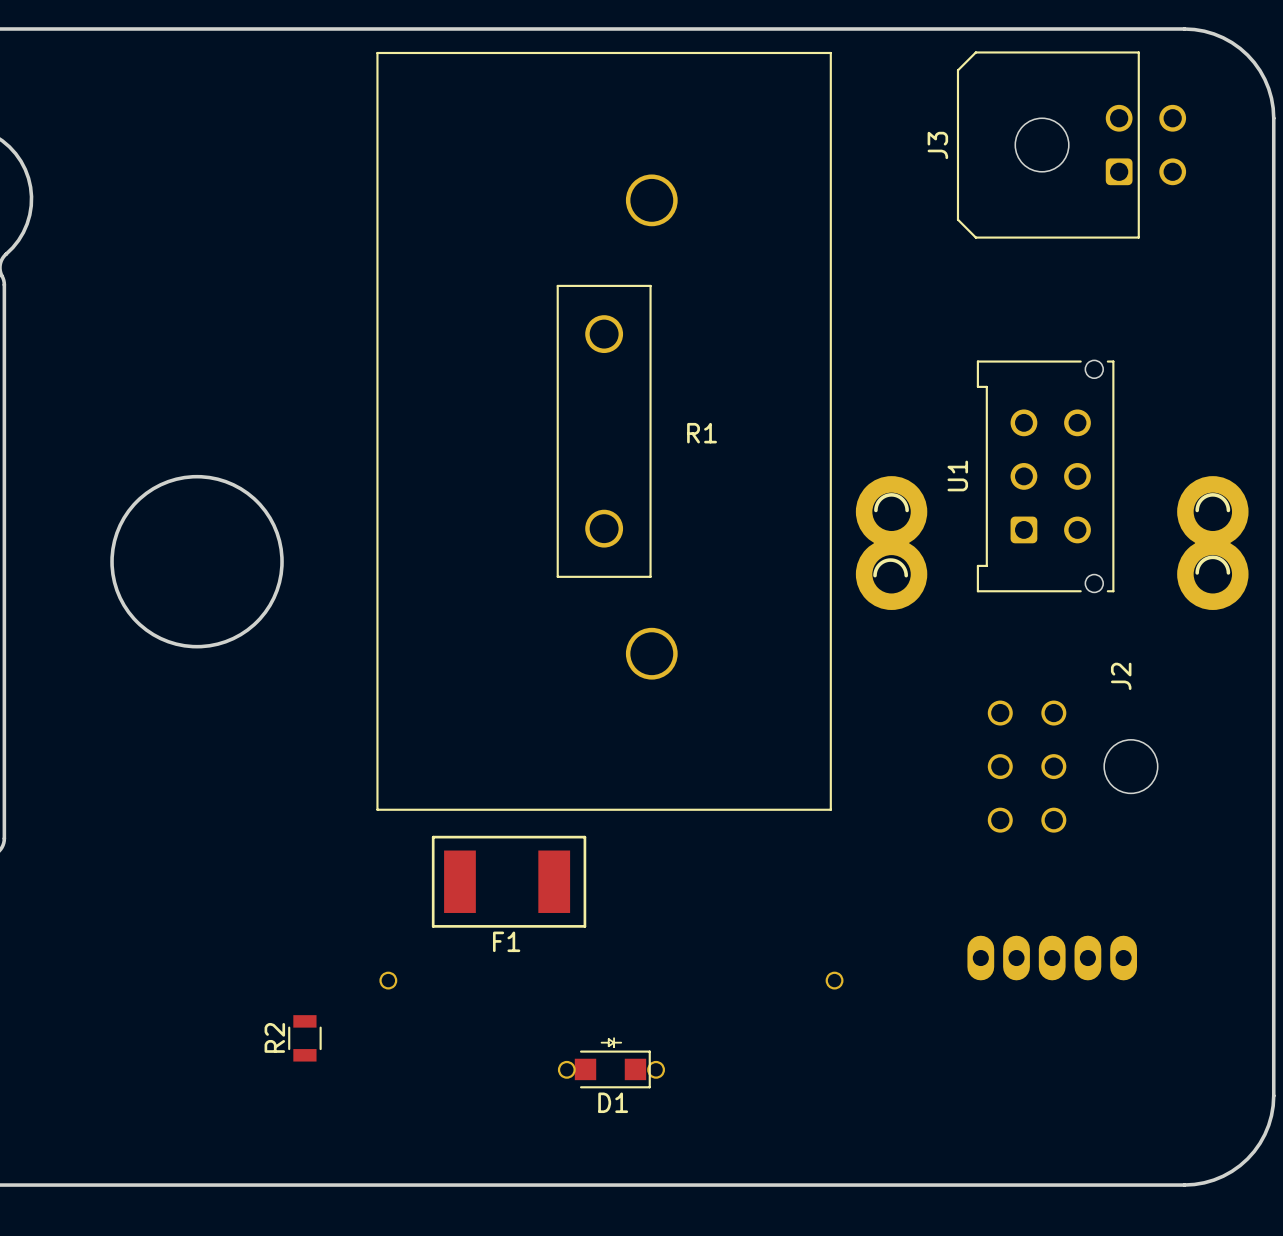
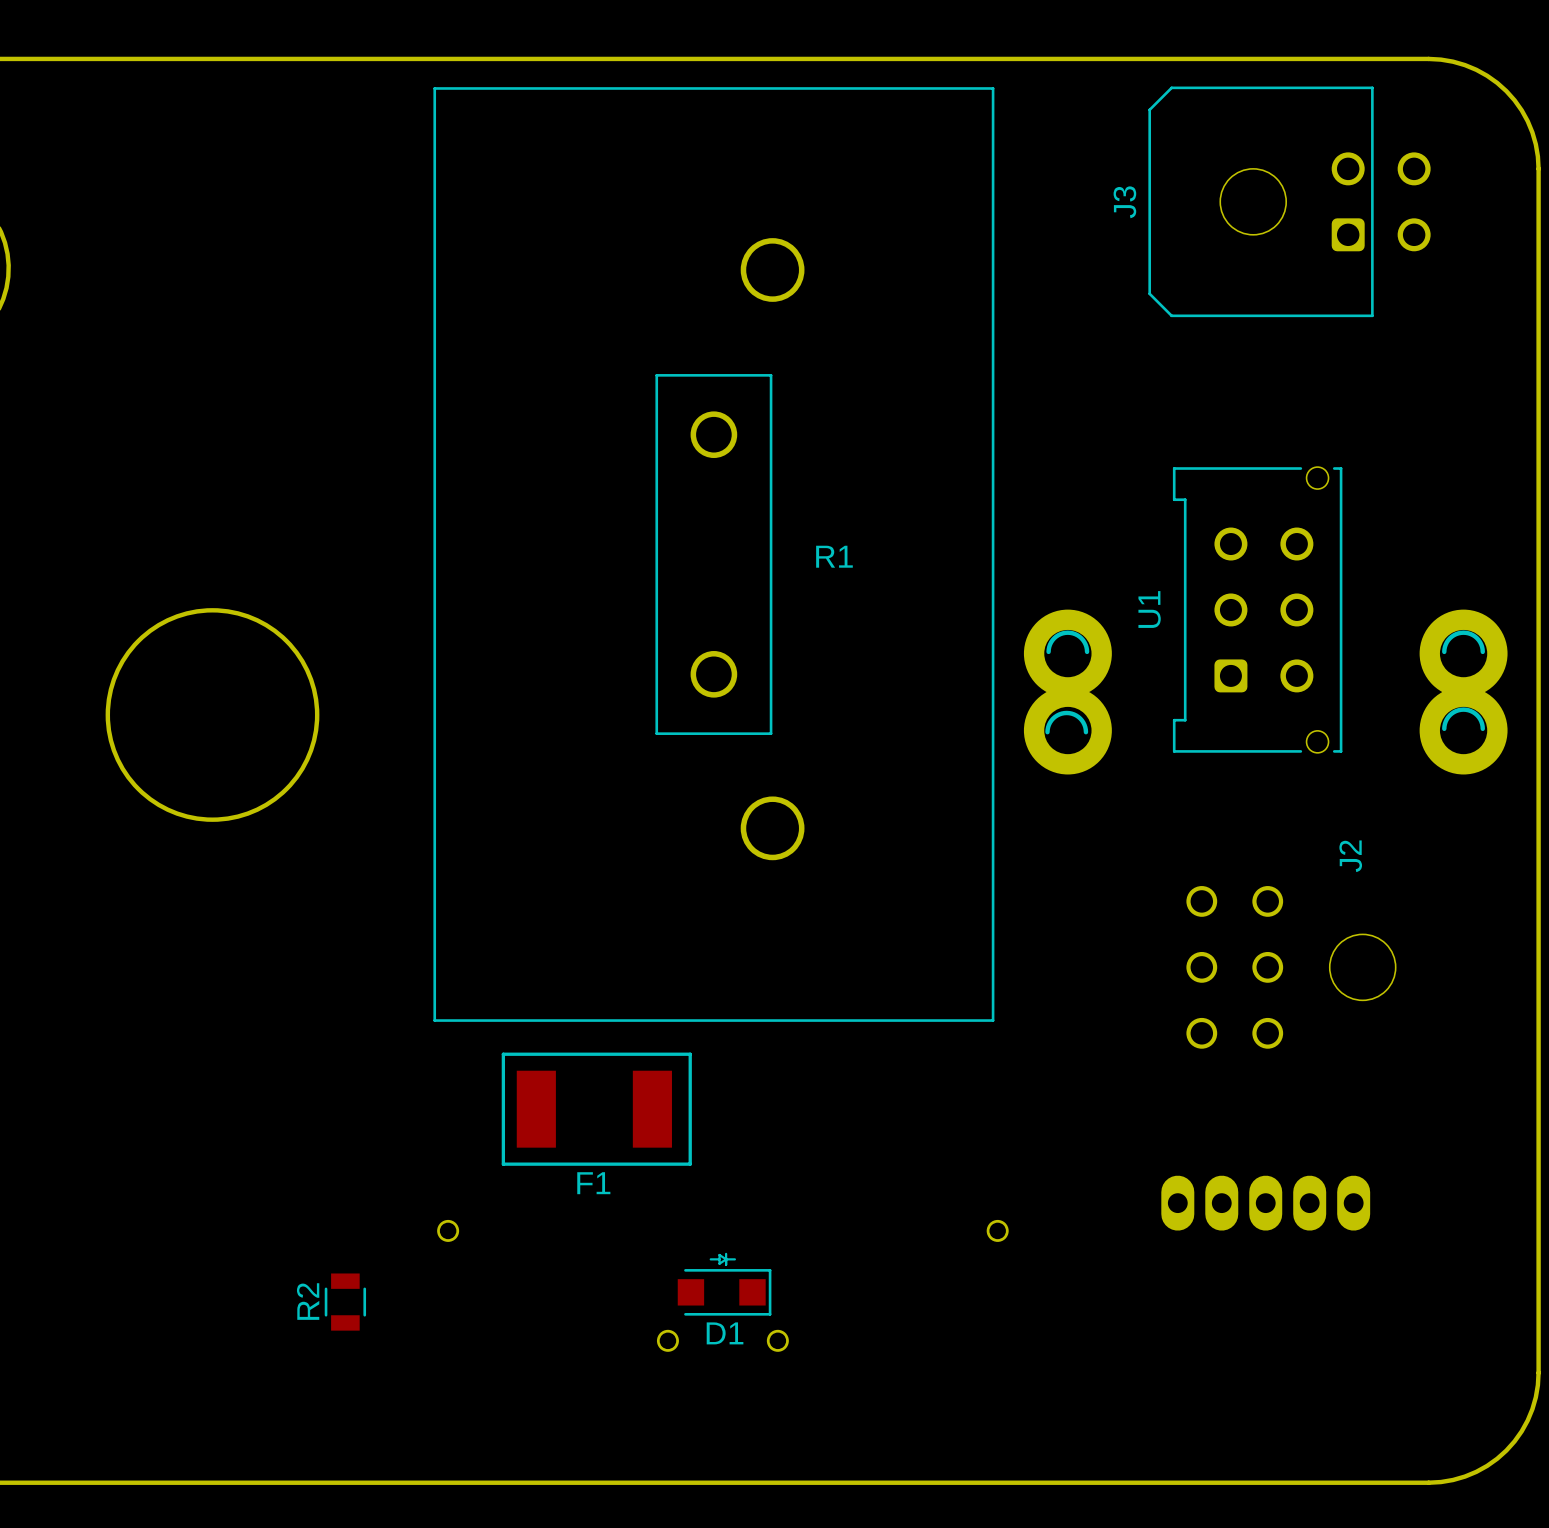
D1 position: (612, 1062) -> (724, 1284)

